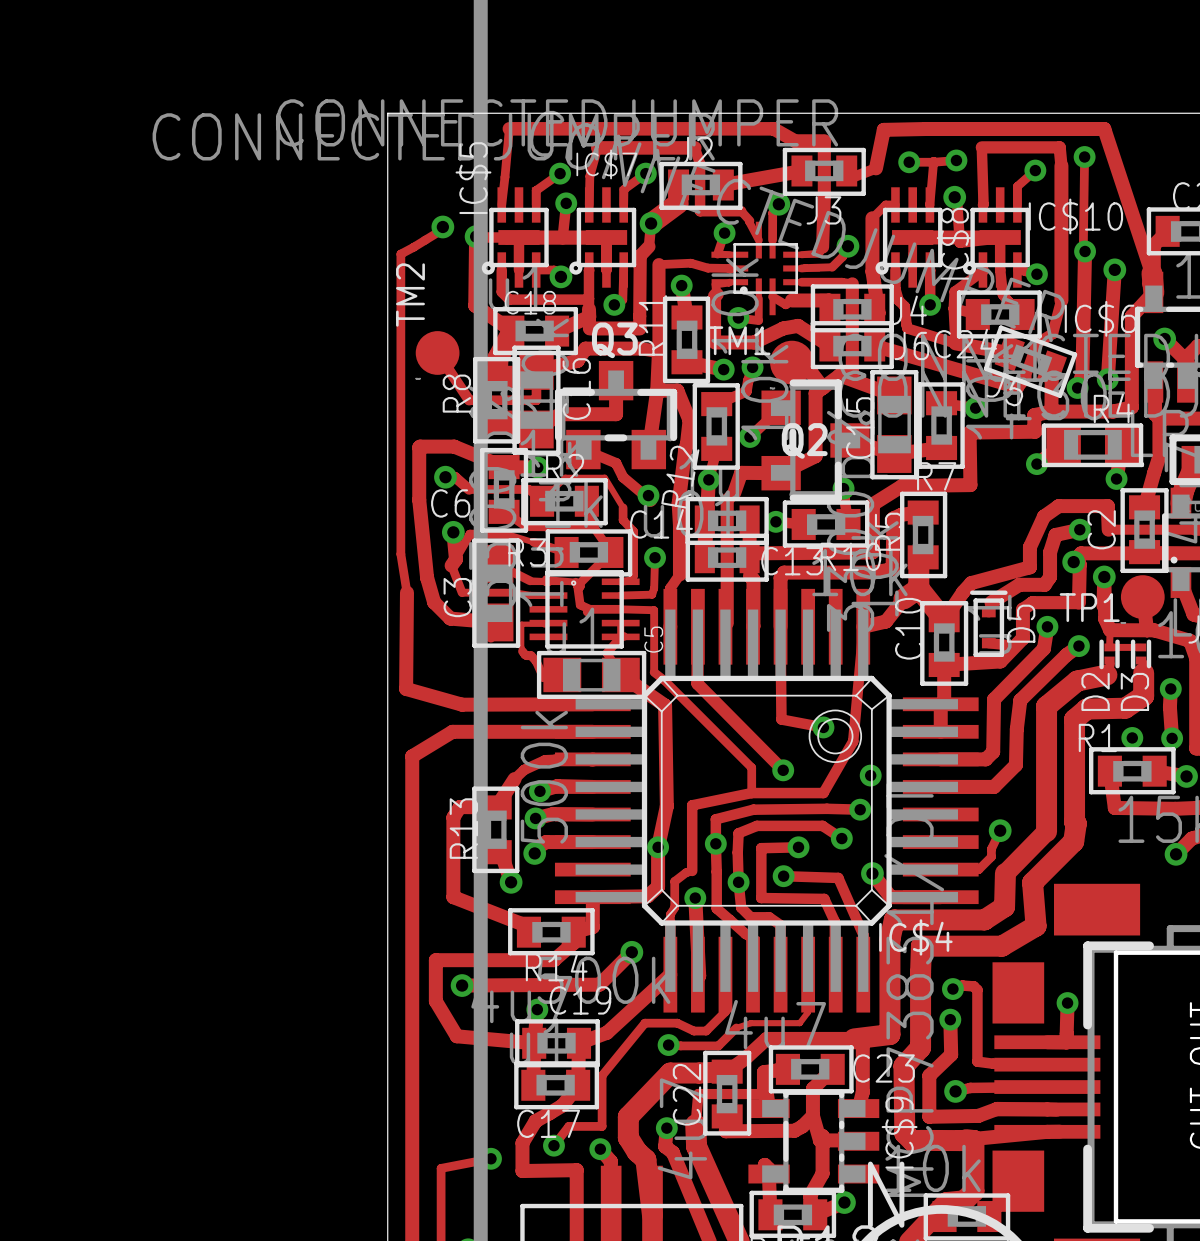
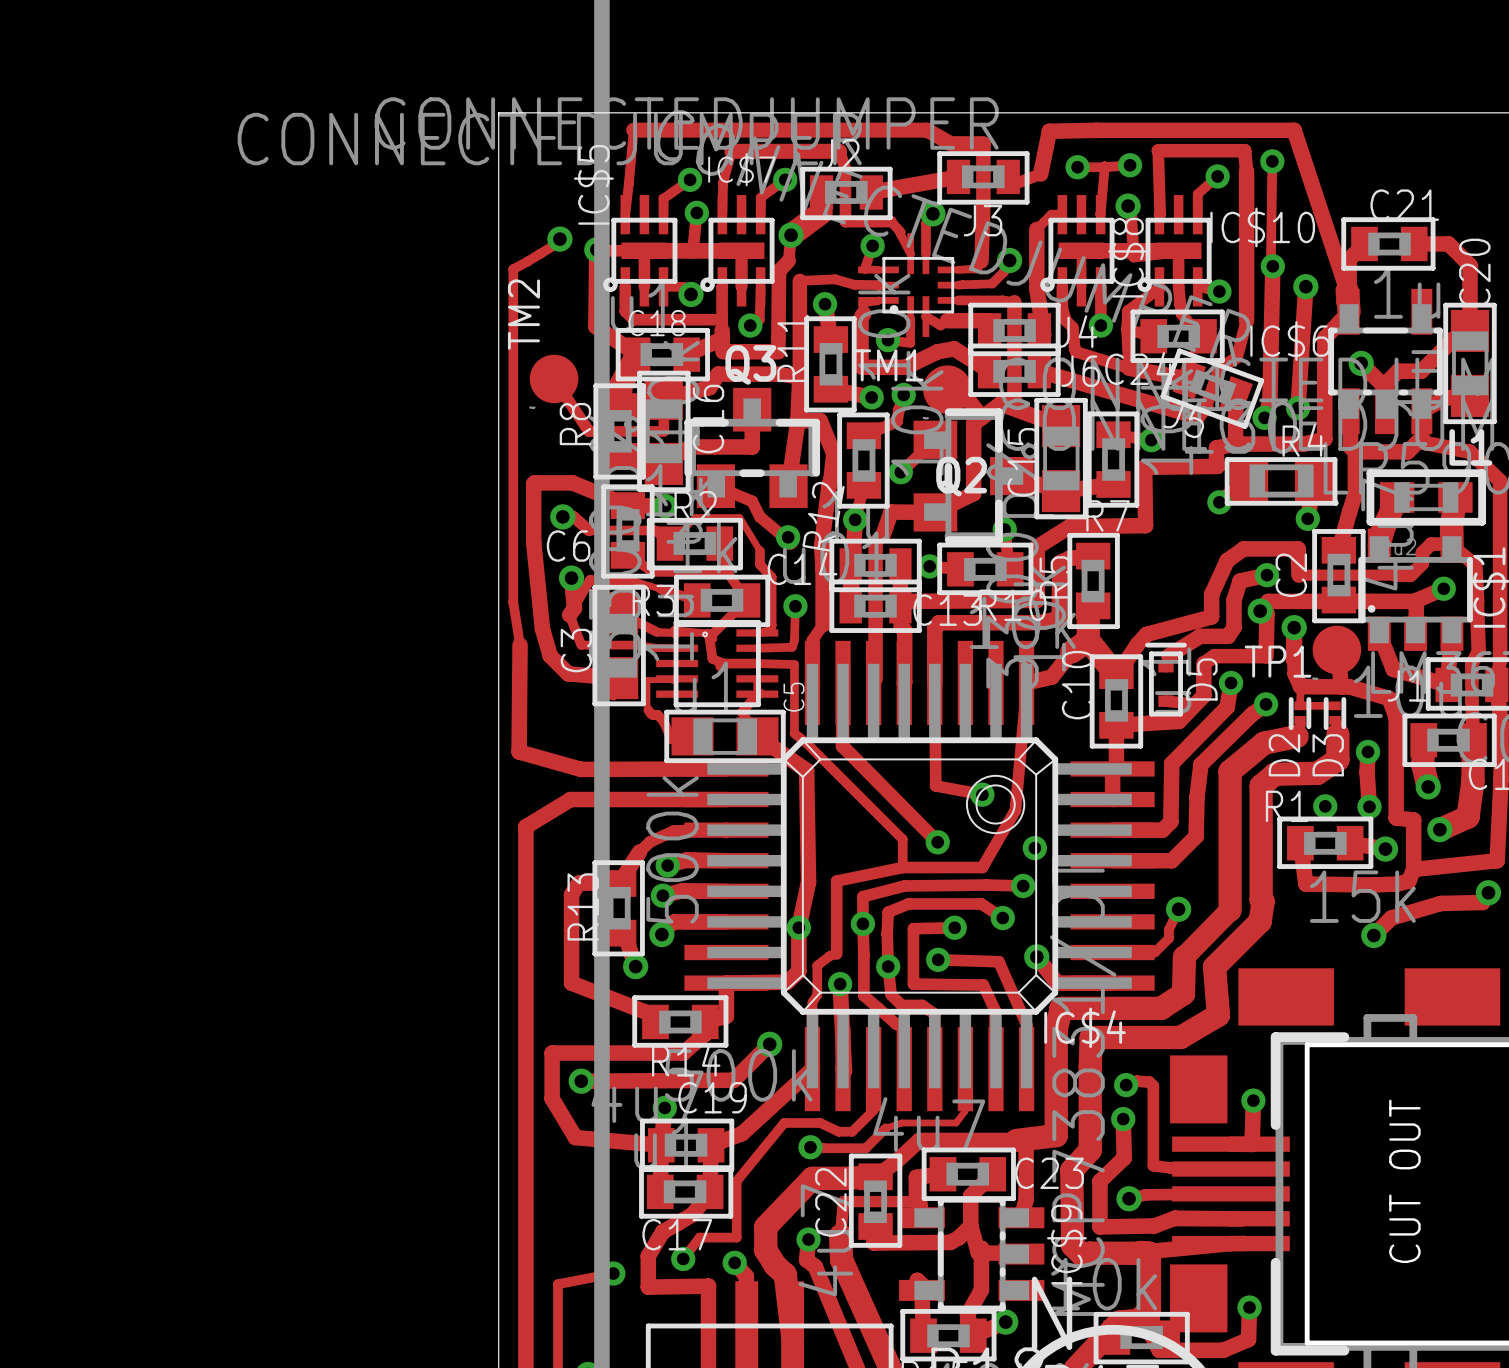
track: none -> (1151, 1293) (1152, 1336) (1159, 1350) (1223, 1350) (1248, 1339) (1249, 1307)
via: none -> (1249, 1307)

